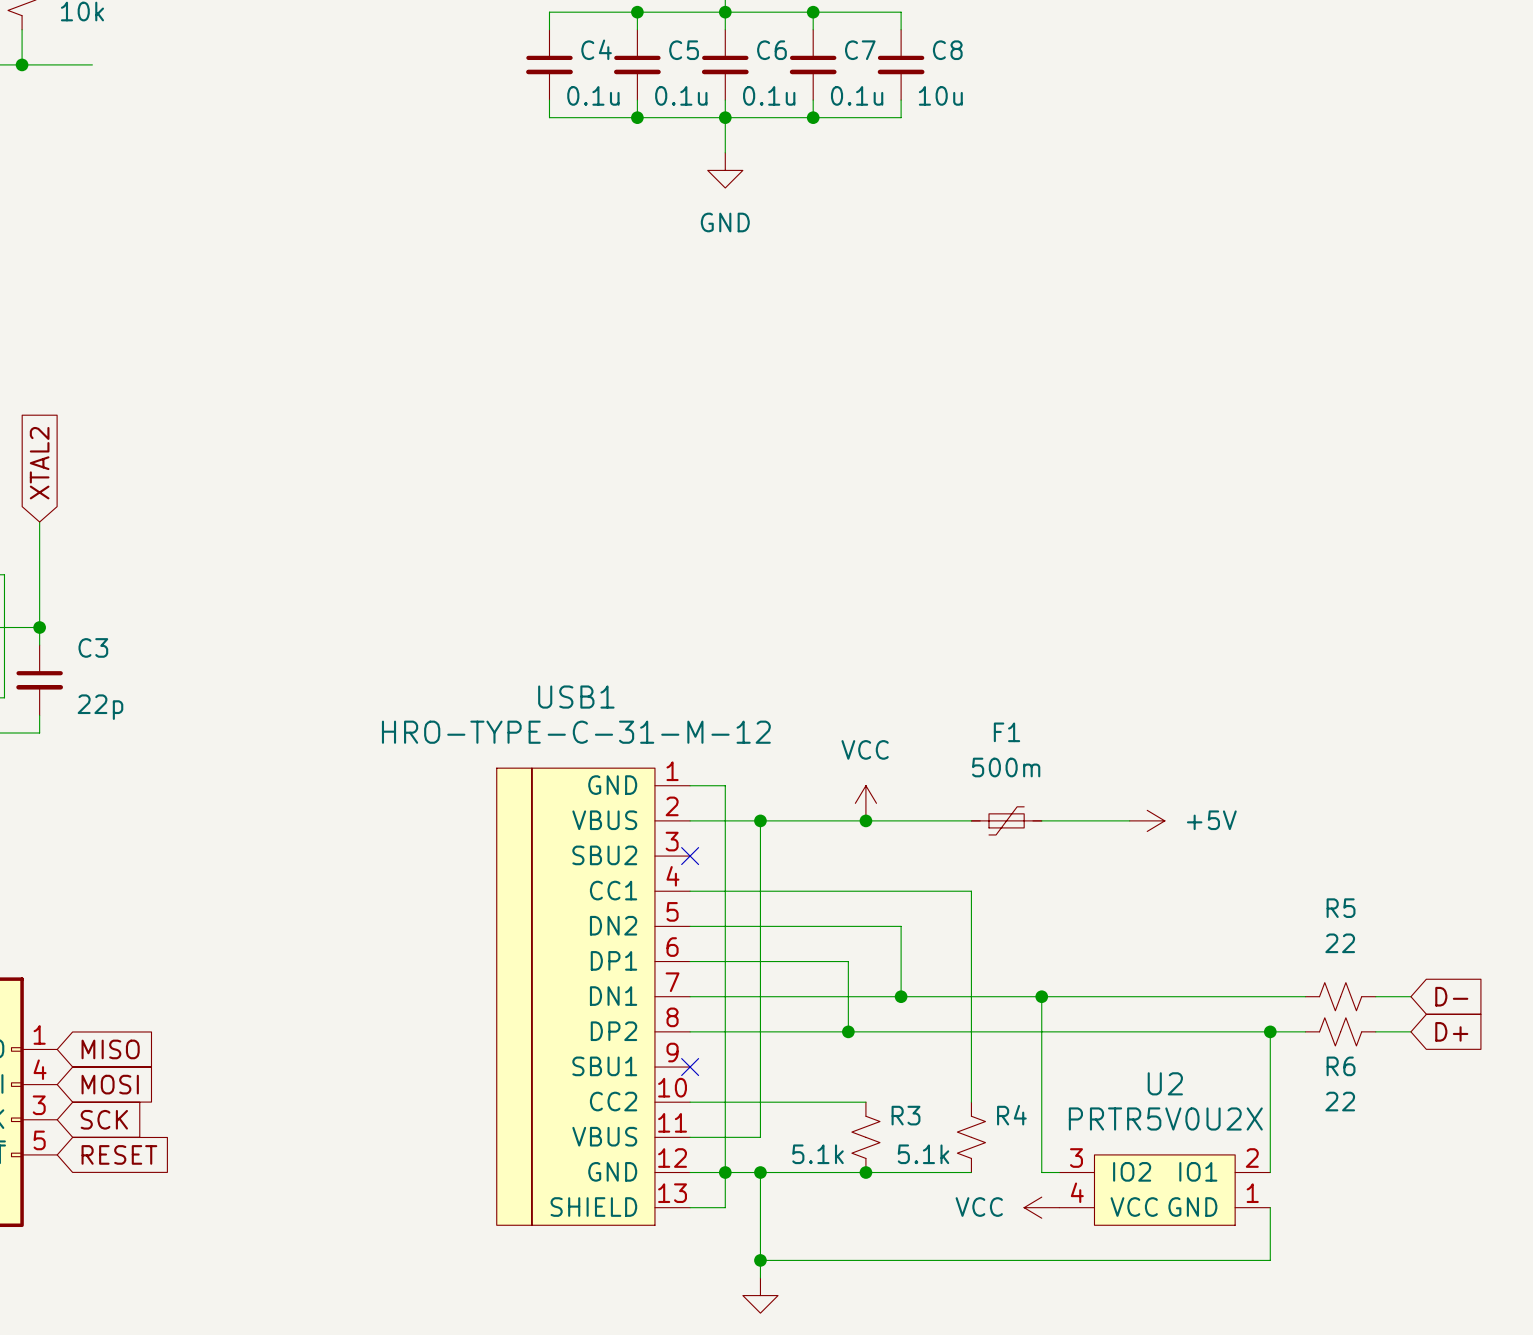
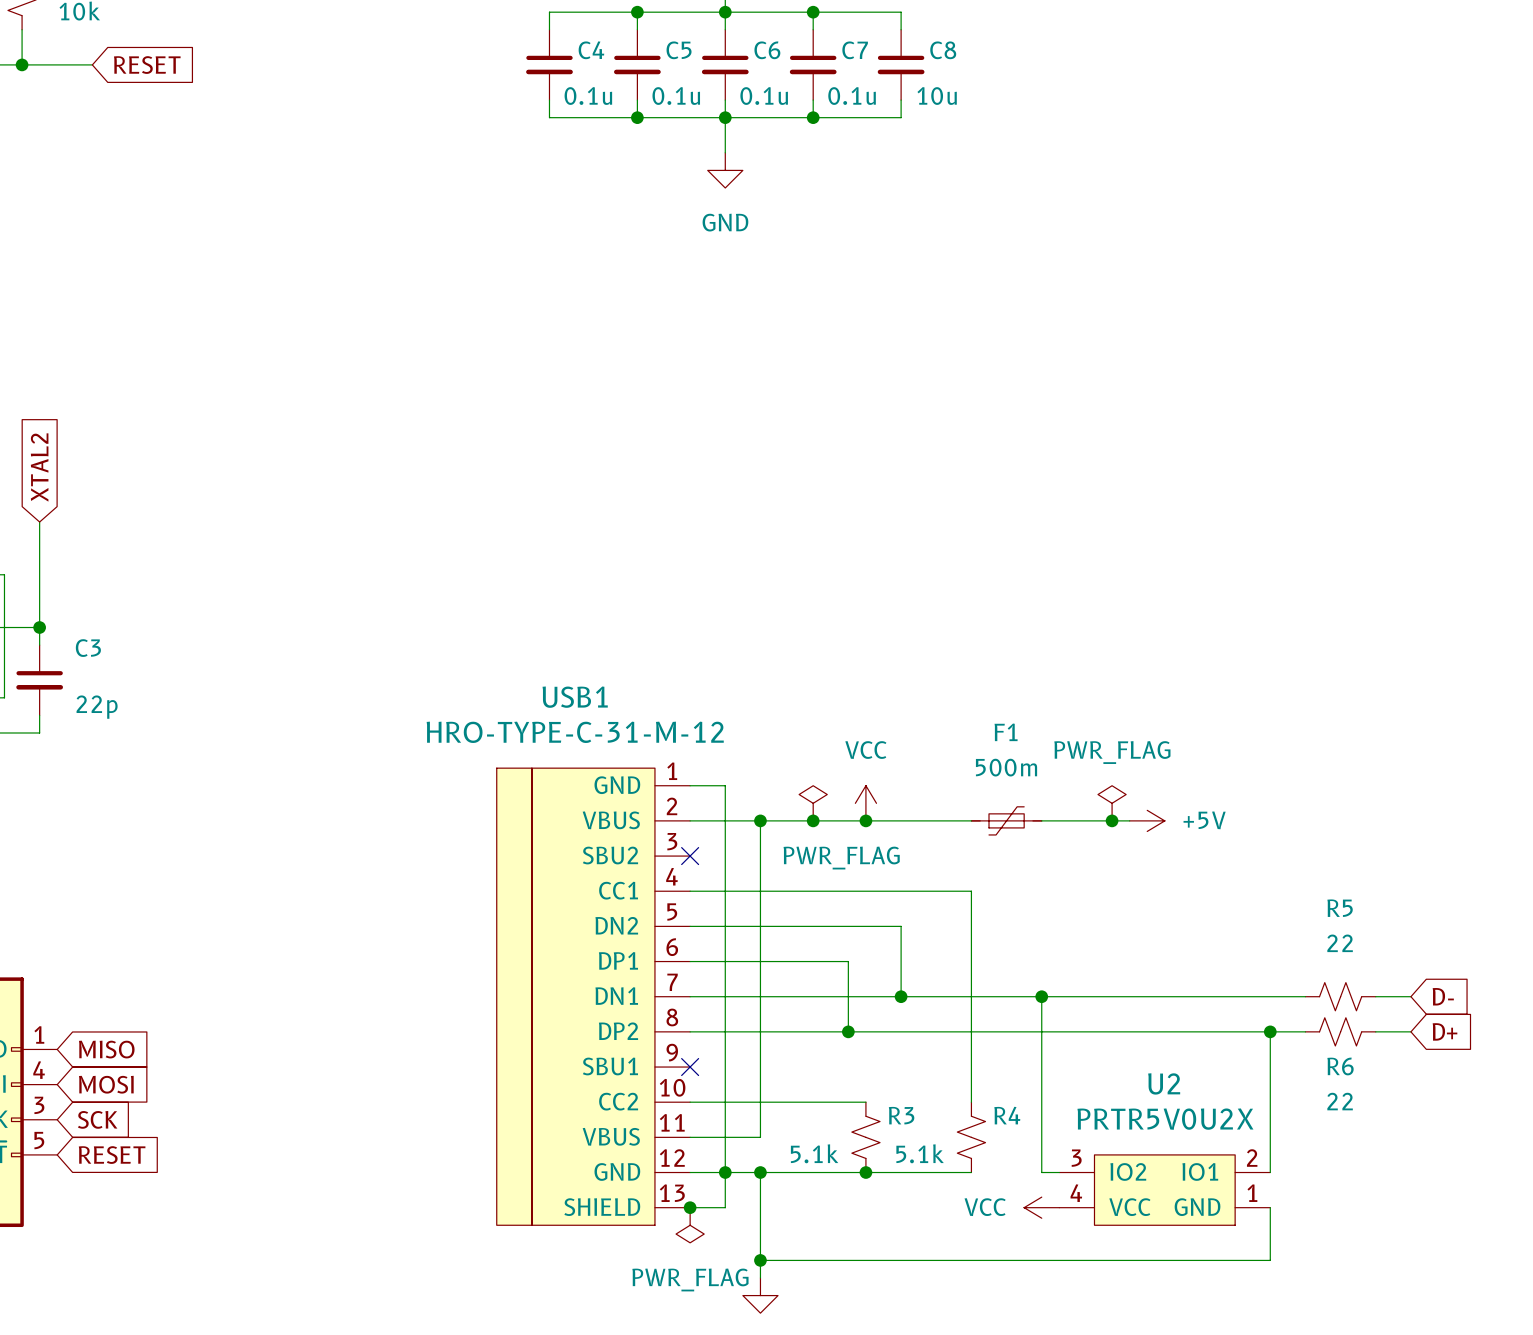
global label: none -> RESET (147, 65)
power symbol: none -> PWR_FLAG (813, 803)
power symbol: none -> PWR_FLAG (1112, 803)
junction: none -> (813, 820)
junction: none -> (1112, 820)
junction: none -> (690, 1207)
power symbol: none -> PWR_FLAG (690, 1225)

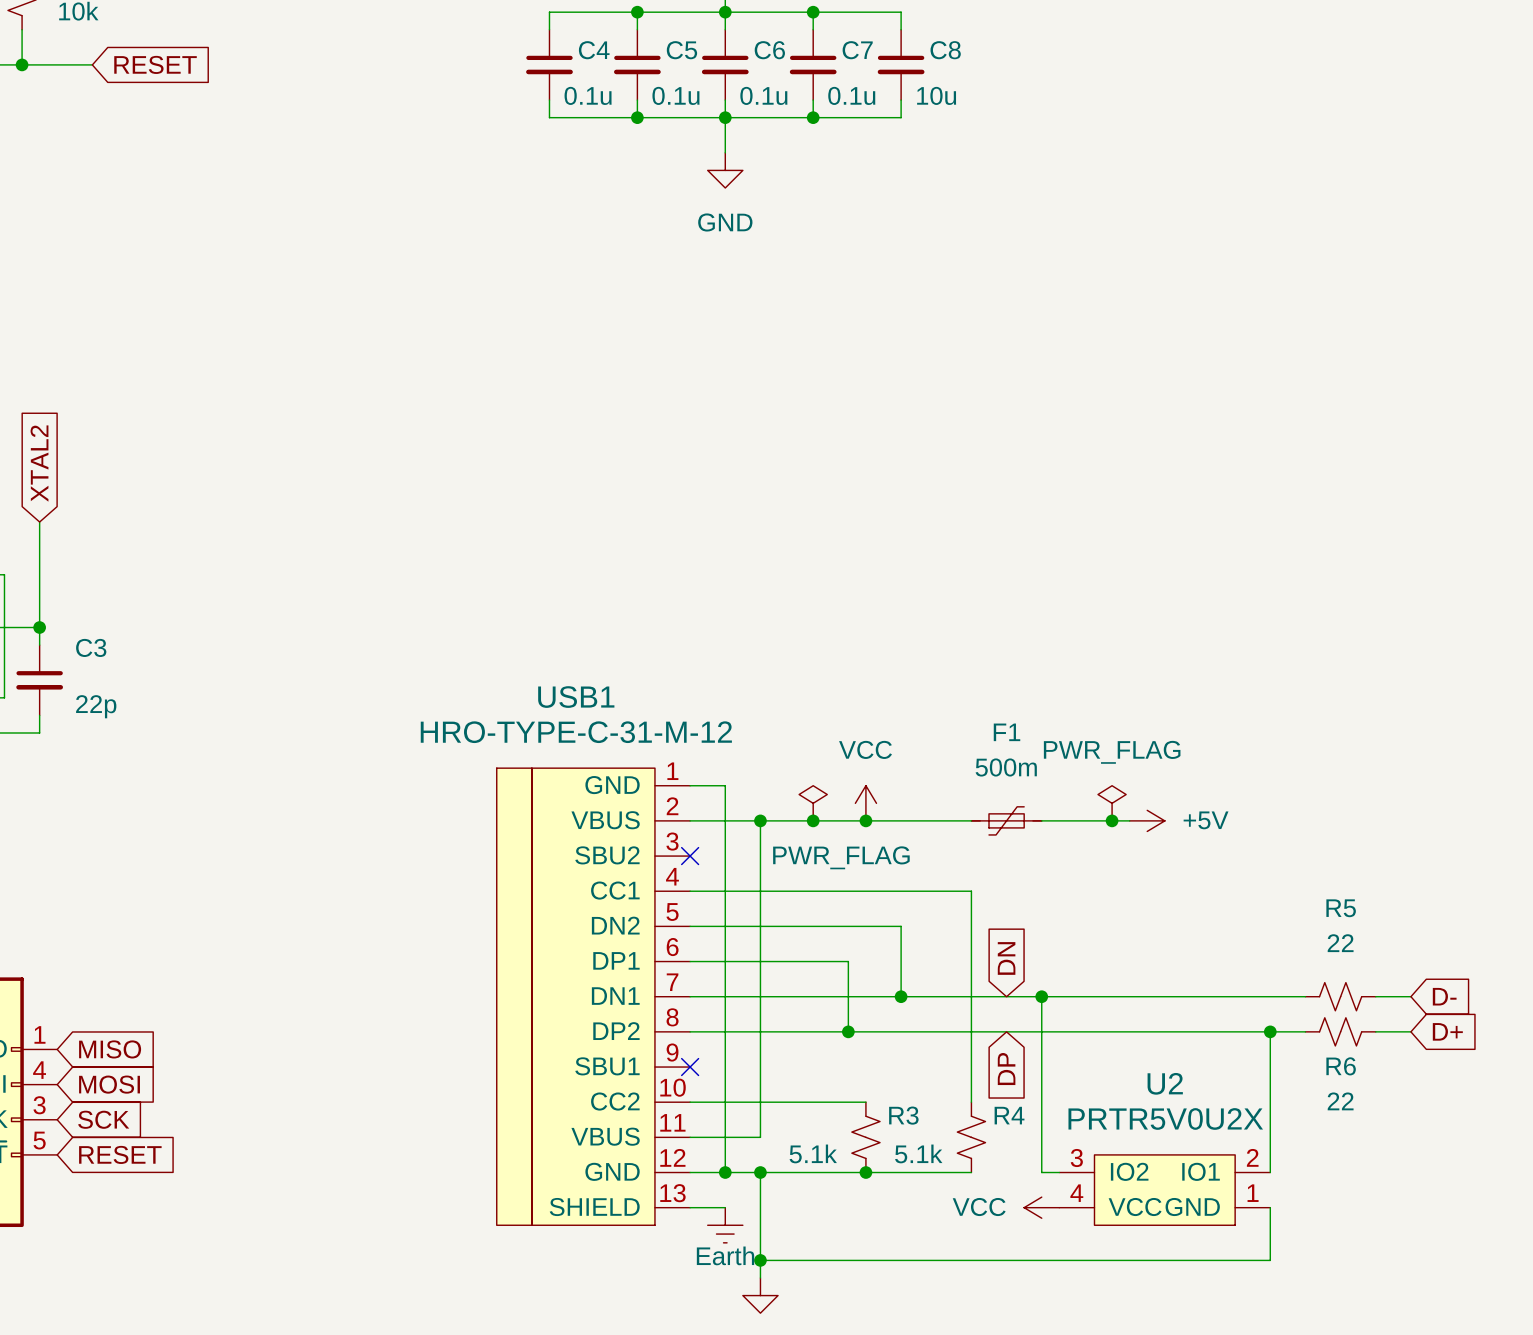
global label: none -> DN (1006, 958)
global label: none -> DP (1006, 1069)
wire: (725, 1172) (725, 1207) -> none
junction: (690, 1207) -> none
power symbol: PWR_FLAG (690, 1225) -> none
power symbol: none -> Earth (725, 1225)

